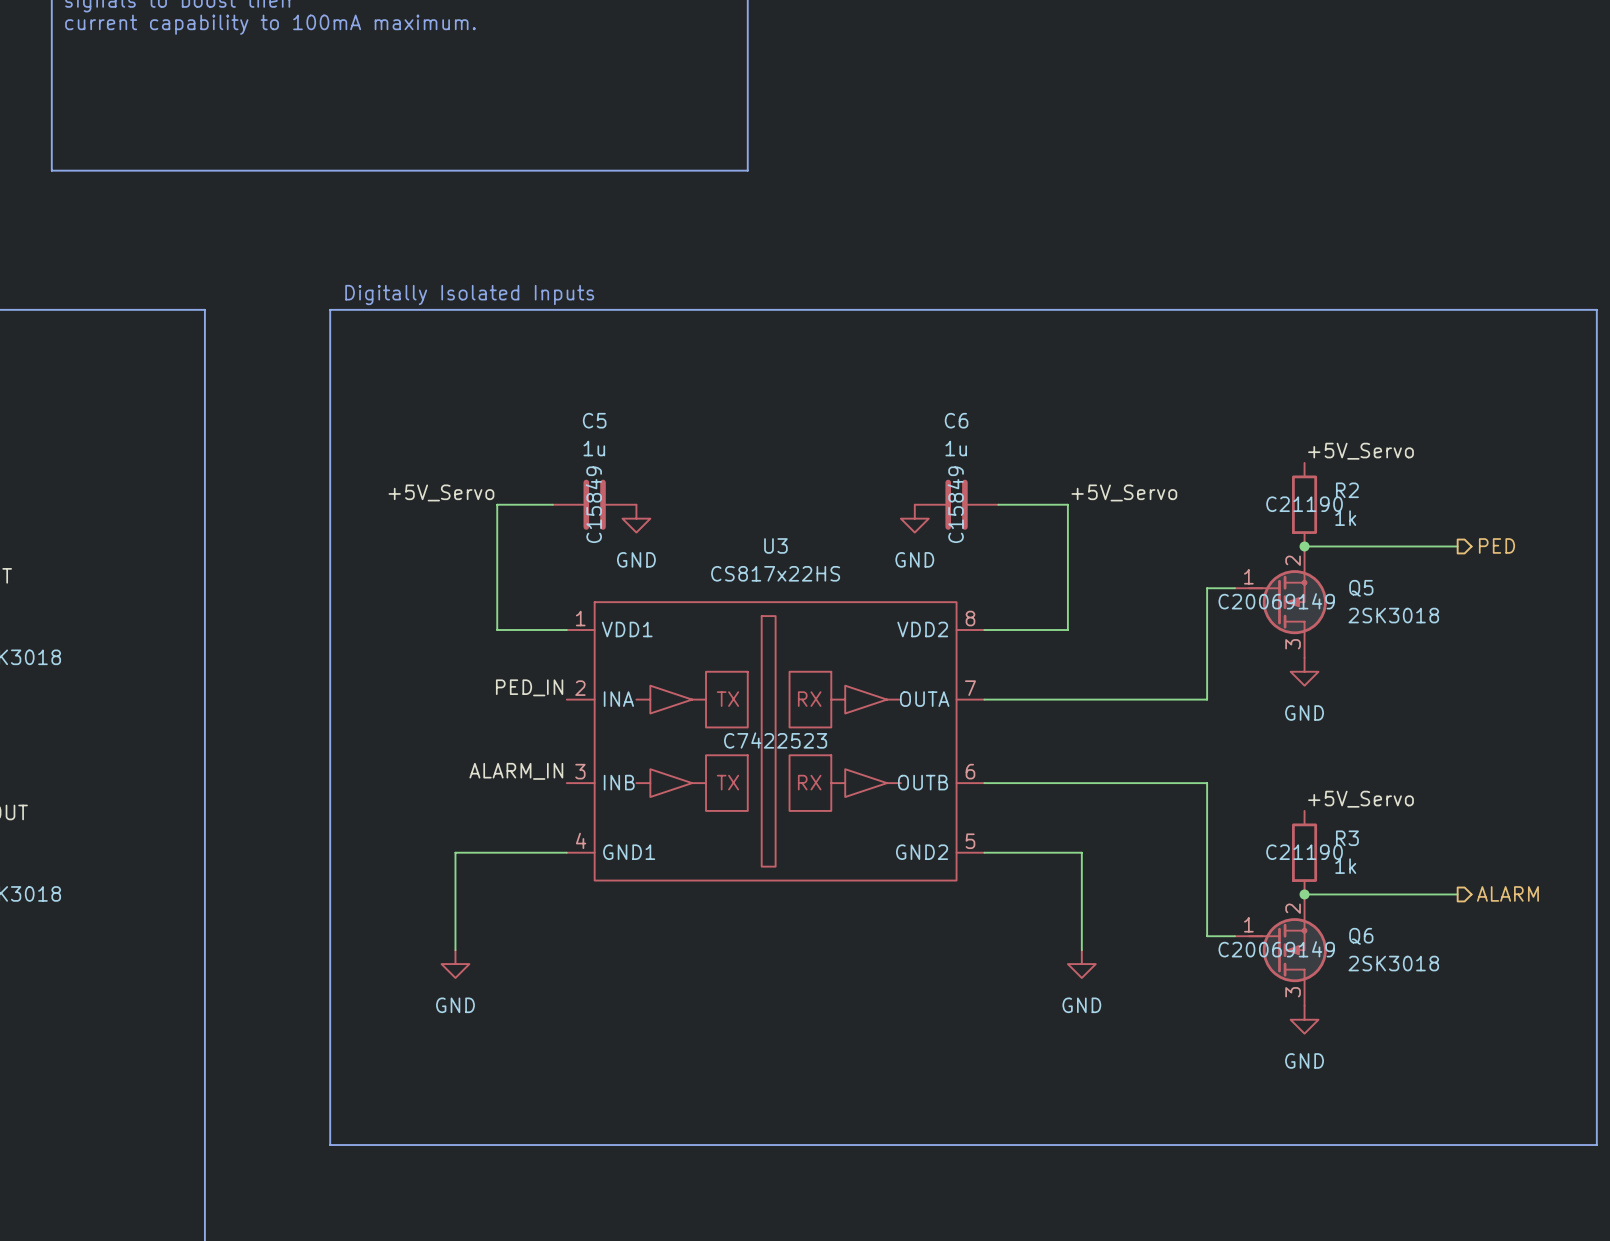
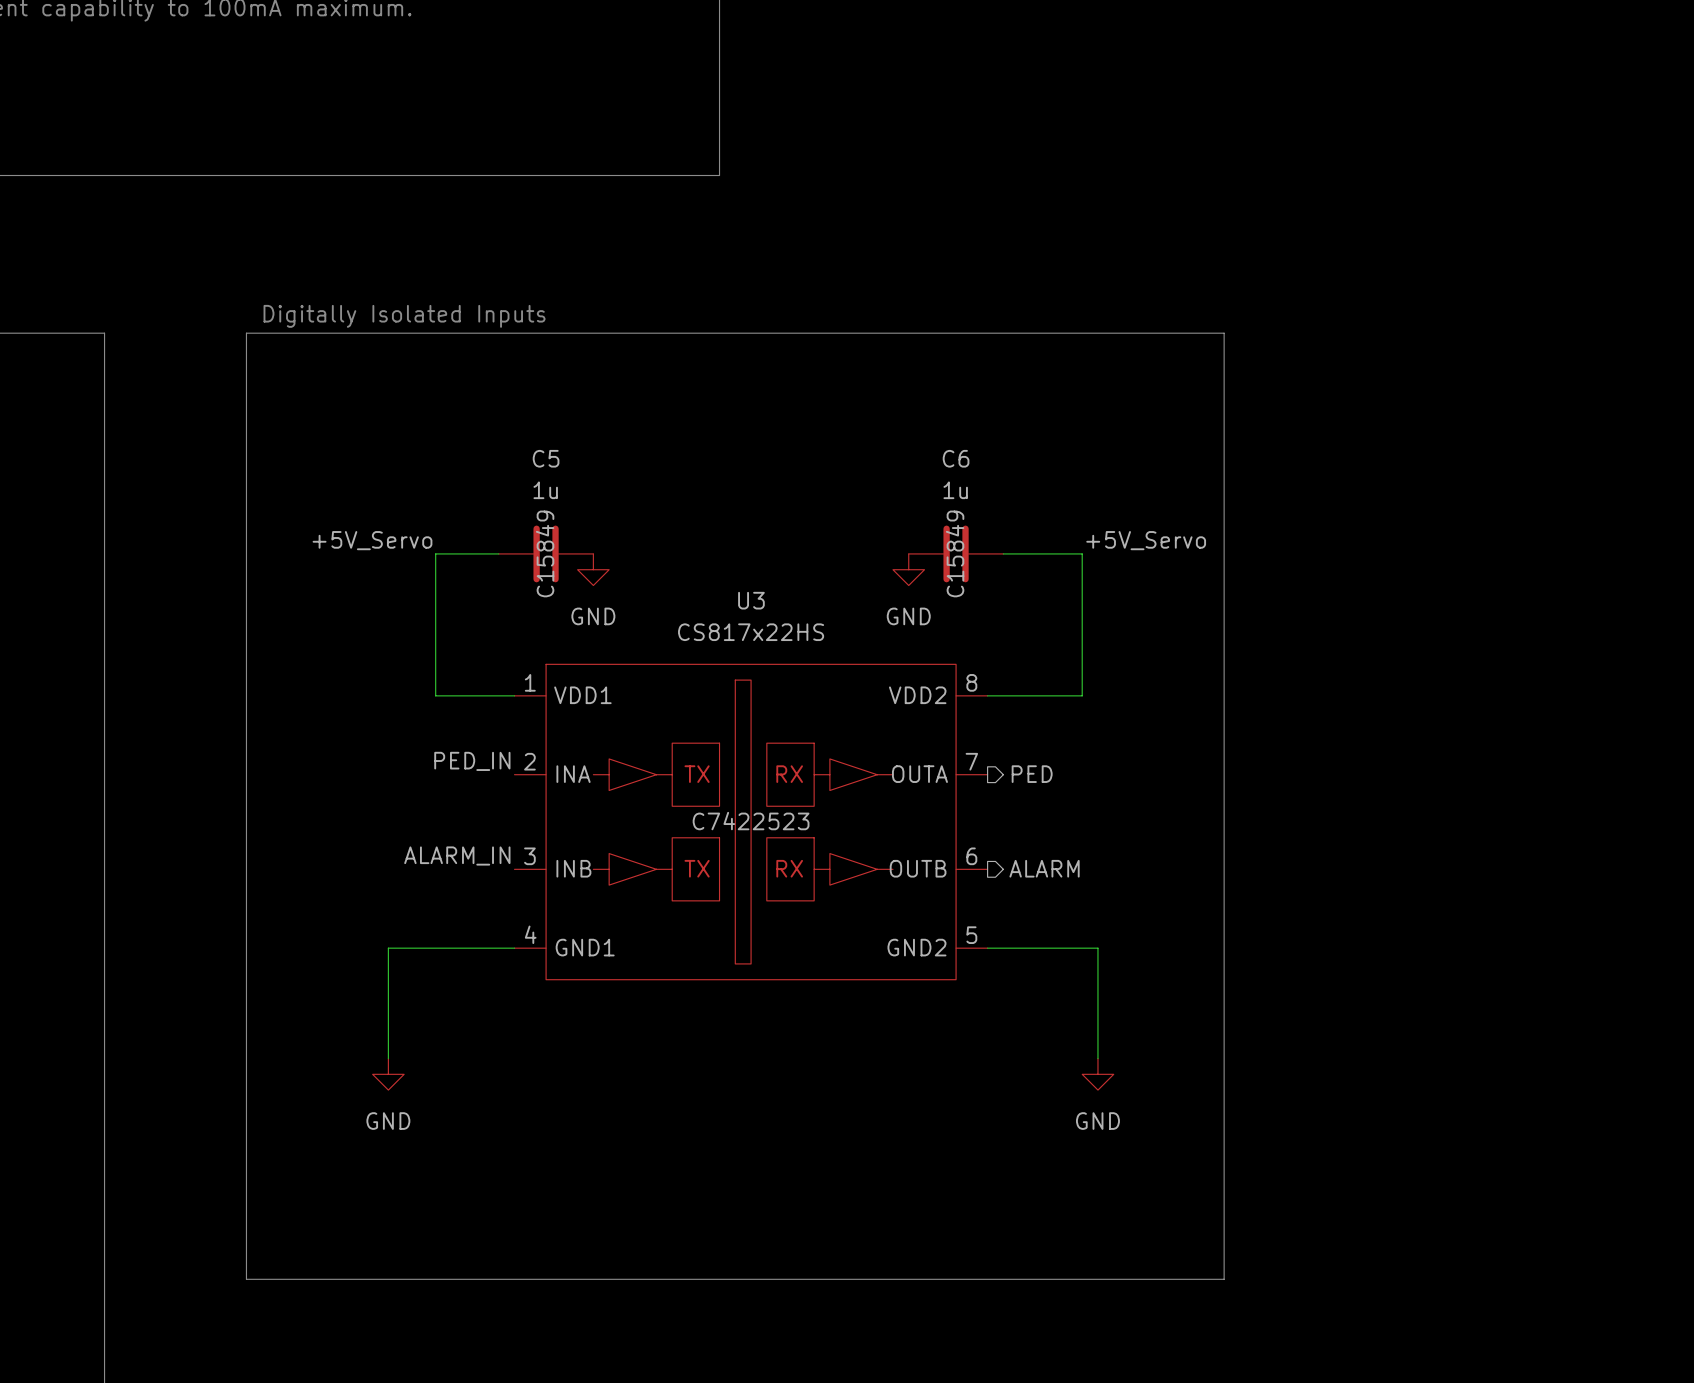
line: (1193, 309) (1596, 309) (1596, 1145) (1193, 1145) -> (1224, 333) (1224, 1279)
label: +5V_Servo (1360, 451) -> none
R2: 1k (1304, 504) -> none
hierarchical label: PED (1496, 545) -> none
wire: (1304, 546) (1457, 546) -> none
junction: (1304, 546) -> none
wire: (1234, 588) (1207, 588) (1207, 699) (984, 699) -> none
Q5: 2SK3018 (1280, 602) -> none
power symbol: GND (1304, 671) -> none
hierarchical label: none -> PED (1032, 774)
hierarchical label: none -> ALARM (1044, 868)
wire: (984, 783) (1207, 783) (1207, 936) (1234, 936) -> none
label: +5V_Servo (1360, 799) -> none
R3: 1k (1304, 852) -> none
hierarchical label: ALARM (1507, 893) -> none
wire: (1304, 894) (1457, 894) -> none
junction: (1304, 894) -> none
Q6: 2SK3018 (1280, 950) -> none
power symbol: GND (1304, 1019) -> none

